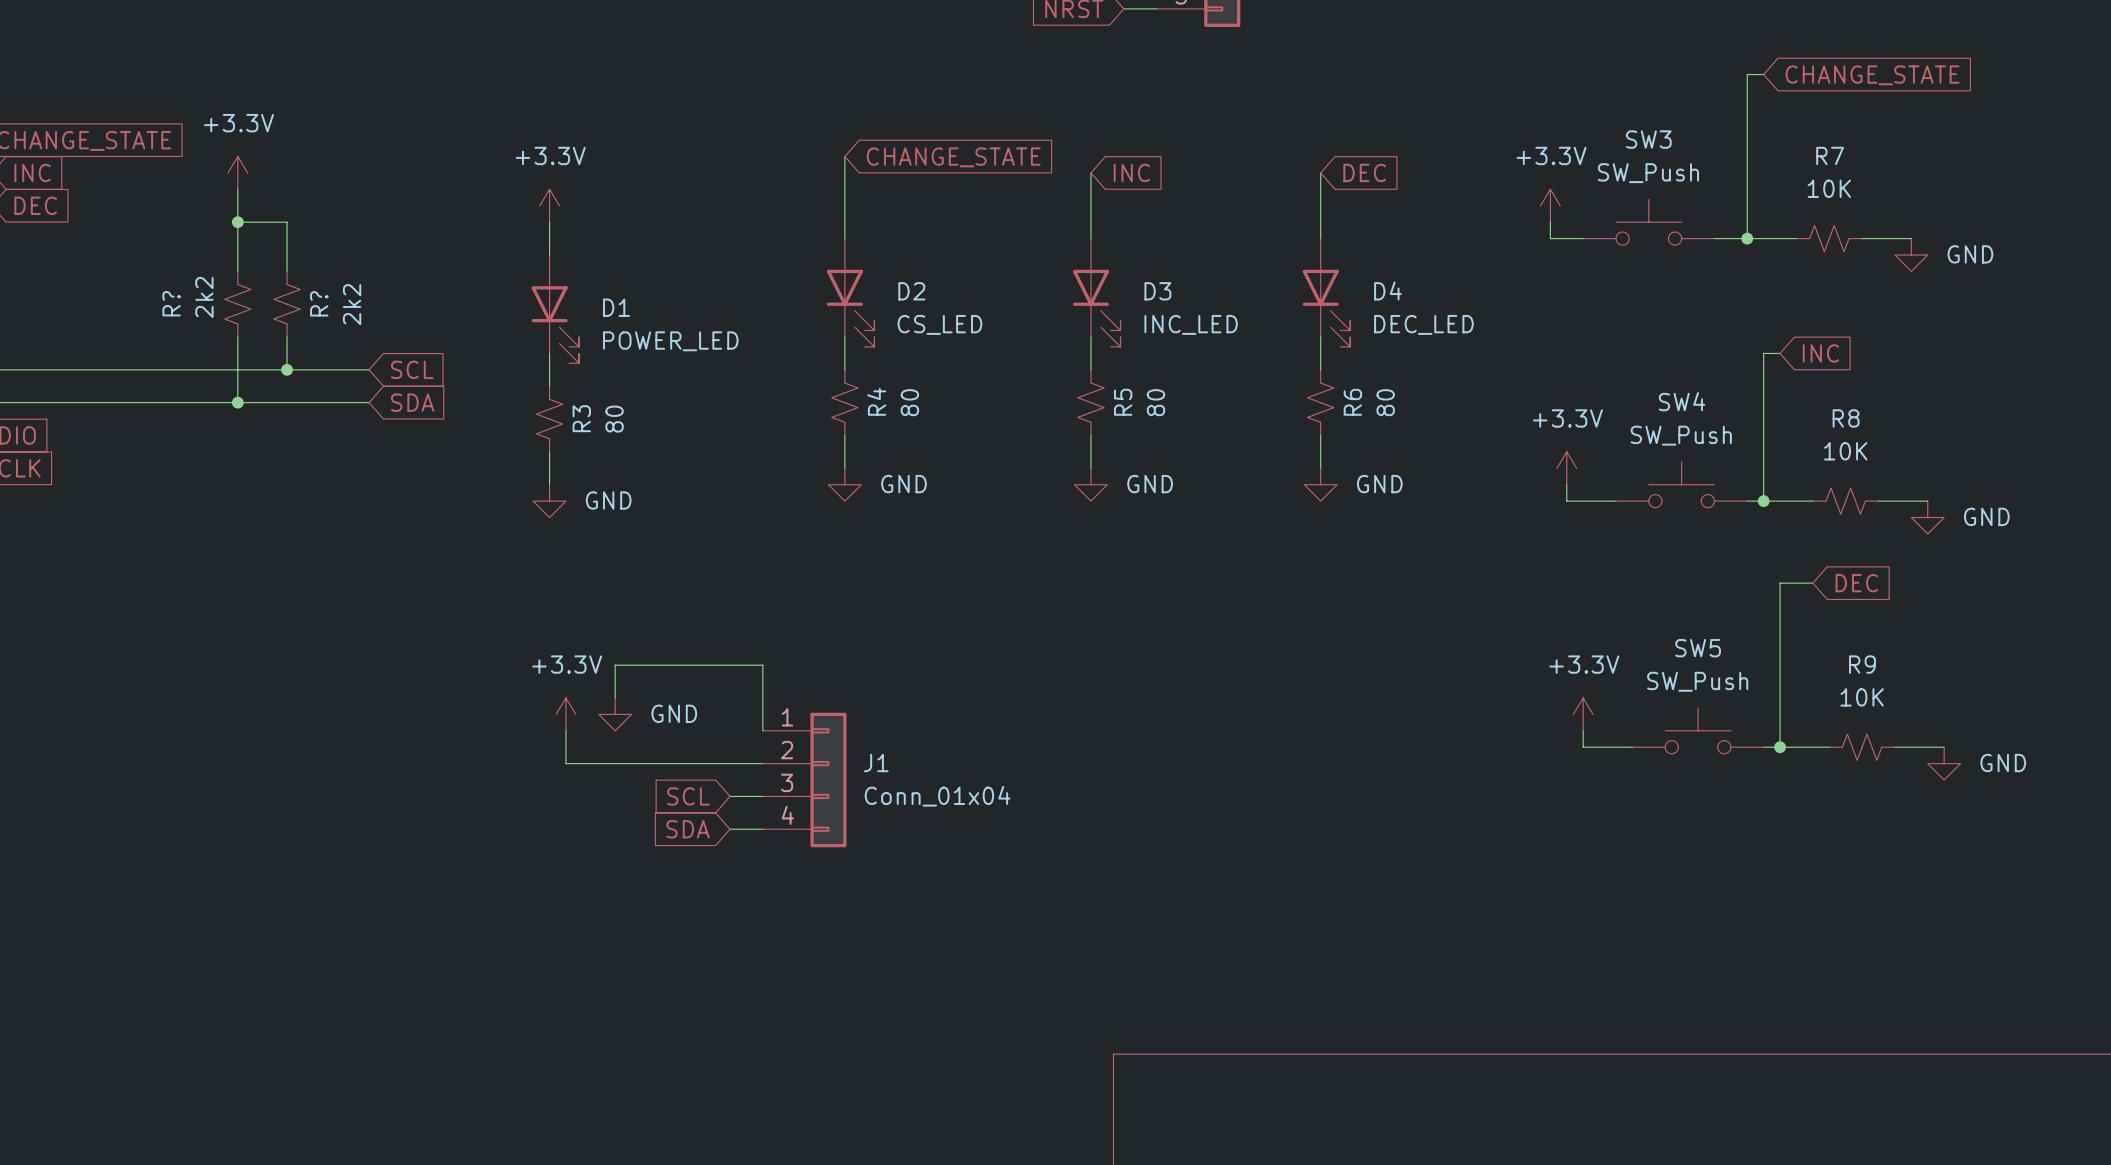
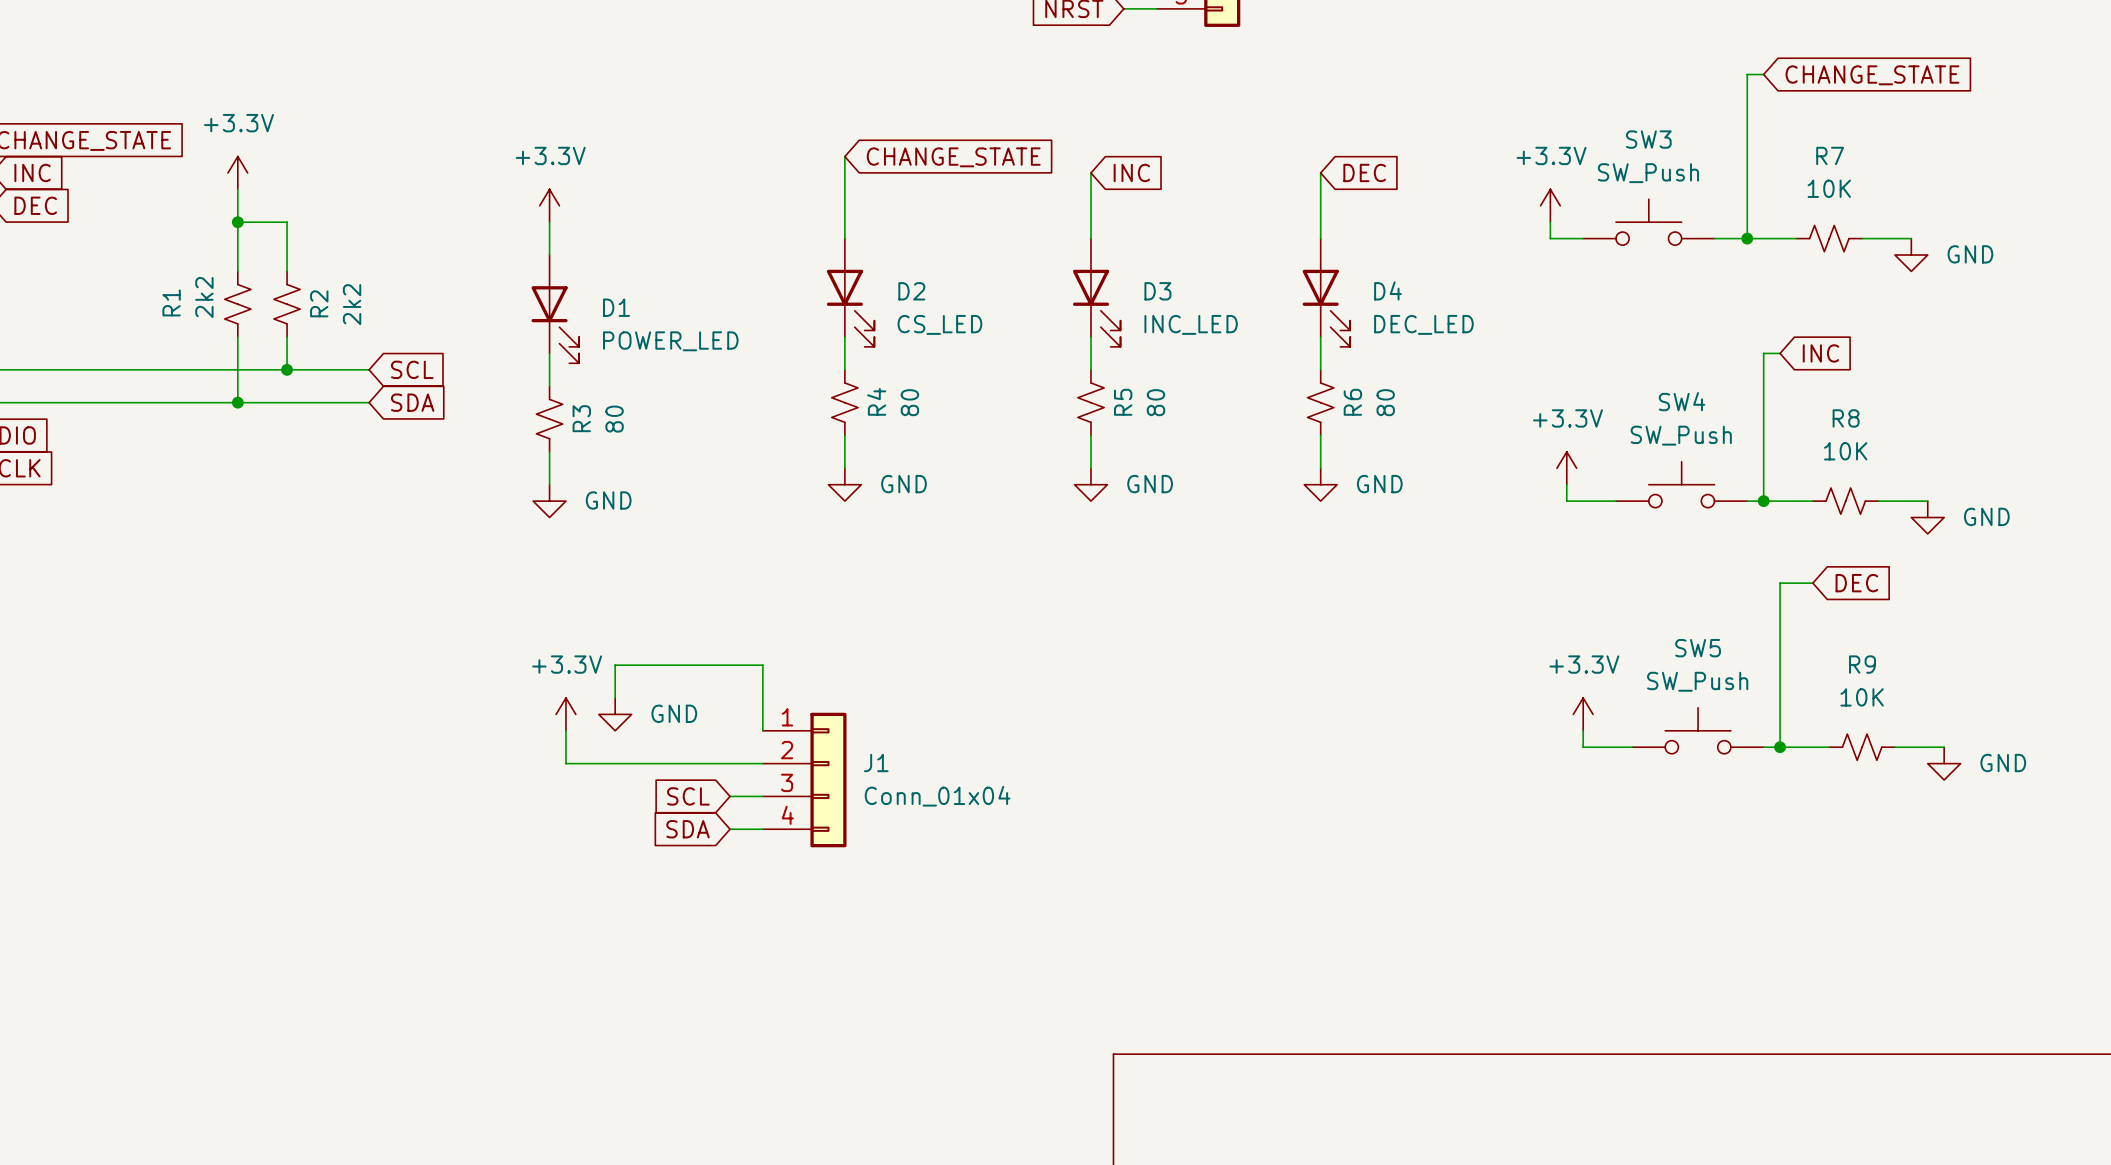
R? name: R? (171, 303) -> R1 (171, 302)
R? name: R? (319, 303) -> R2 (319, 303)

